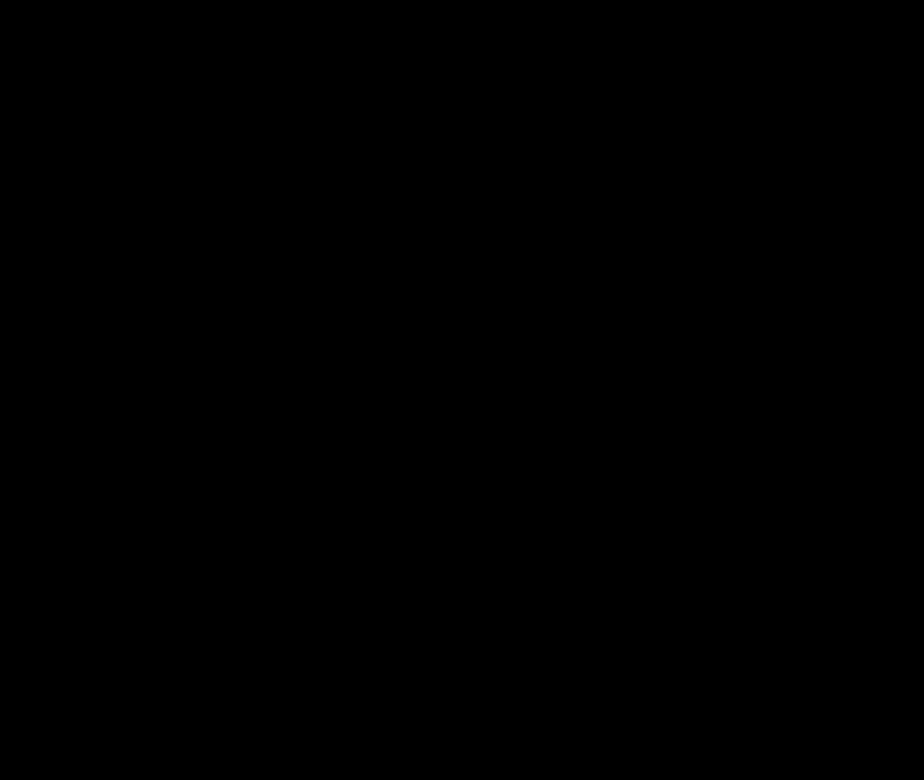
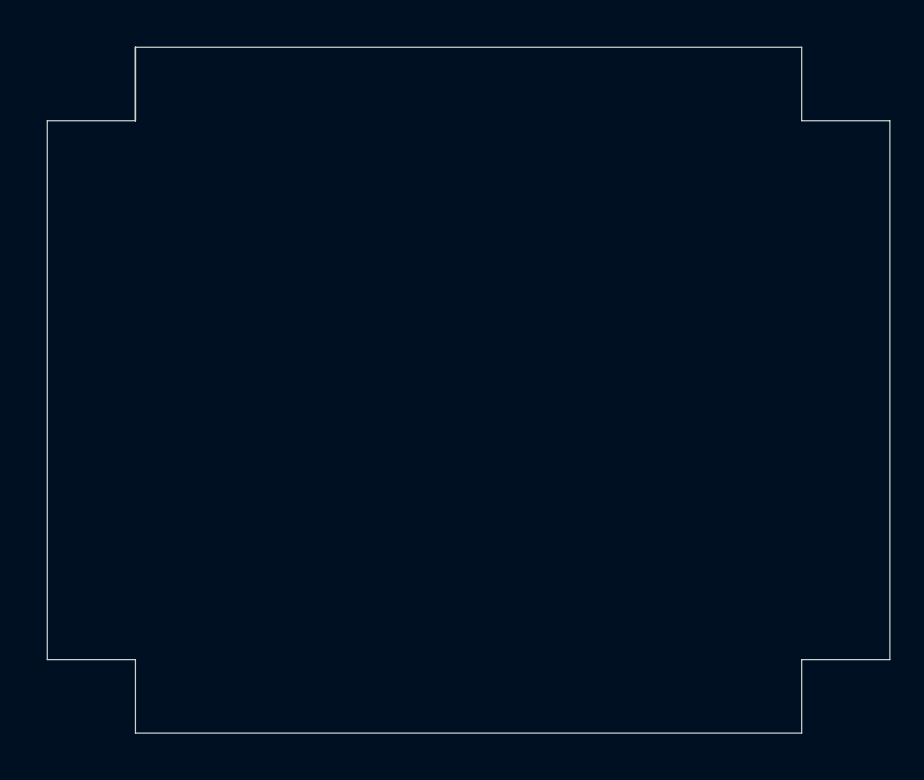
board edge: none -> (135, 47) (135, 120) (47, 120) (47, 659) (135, 659) (135, 733) (801, 733) (801, 659) (889, 659) (889, 120) (801, 120) (801, 47) (135, 47)

